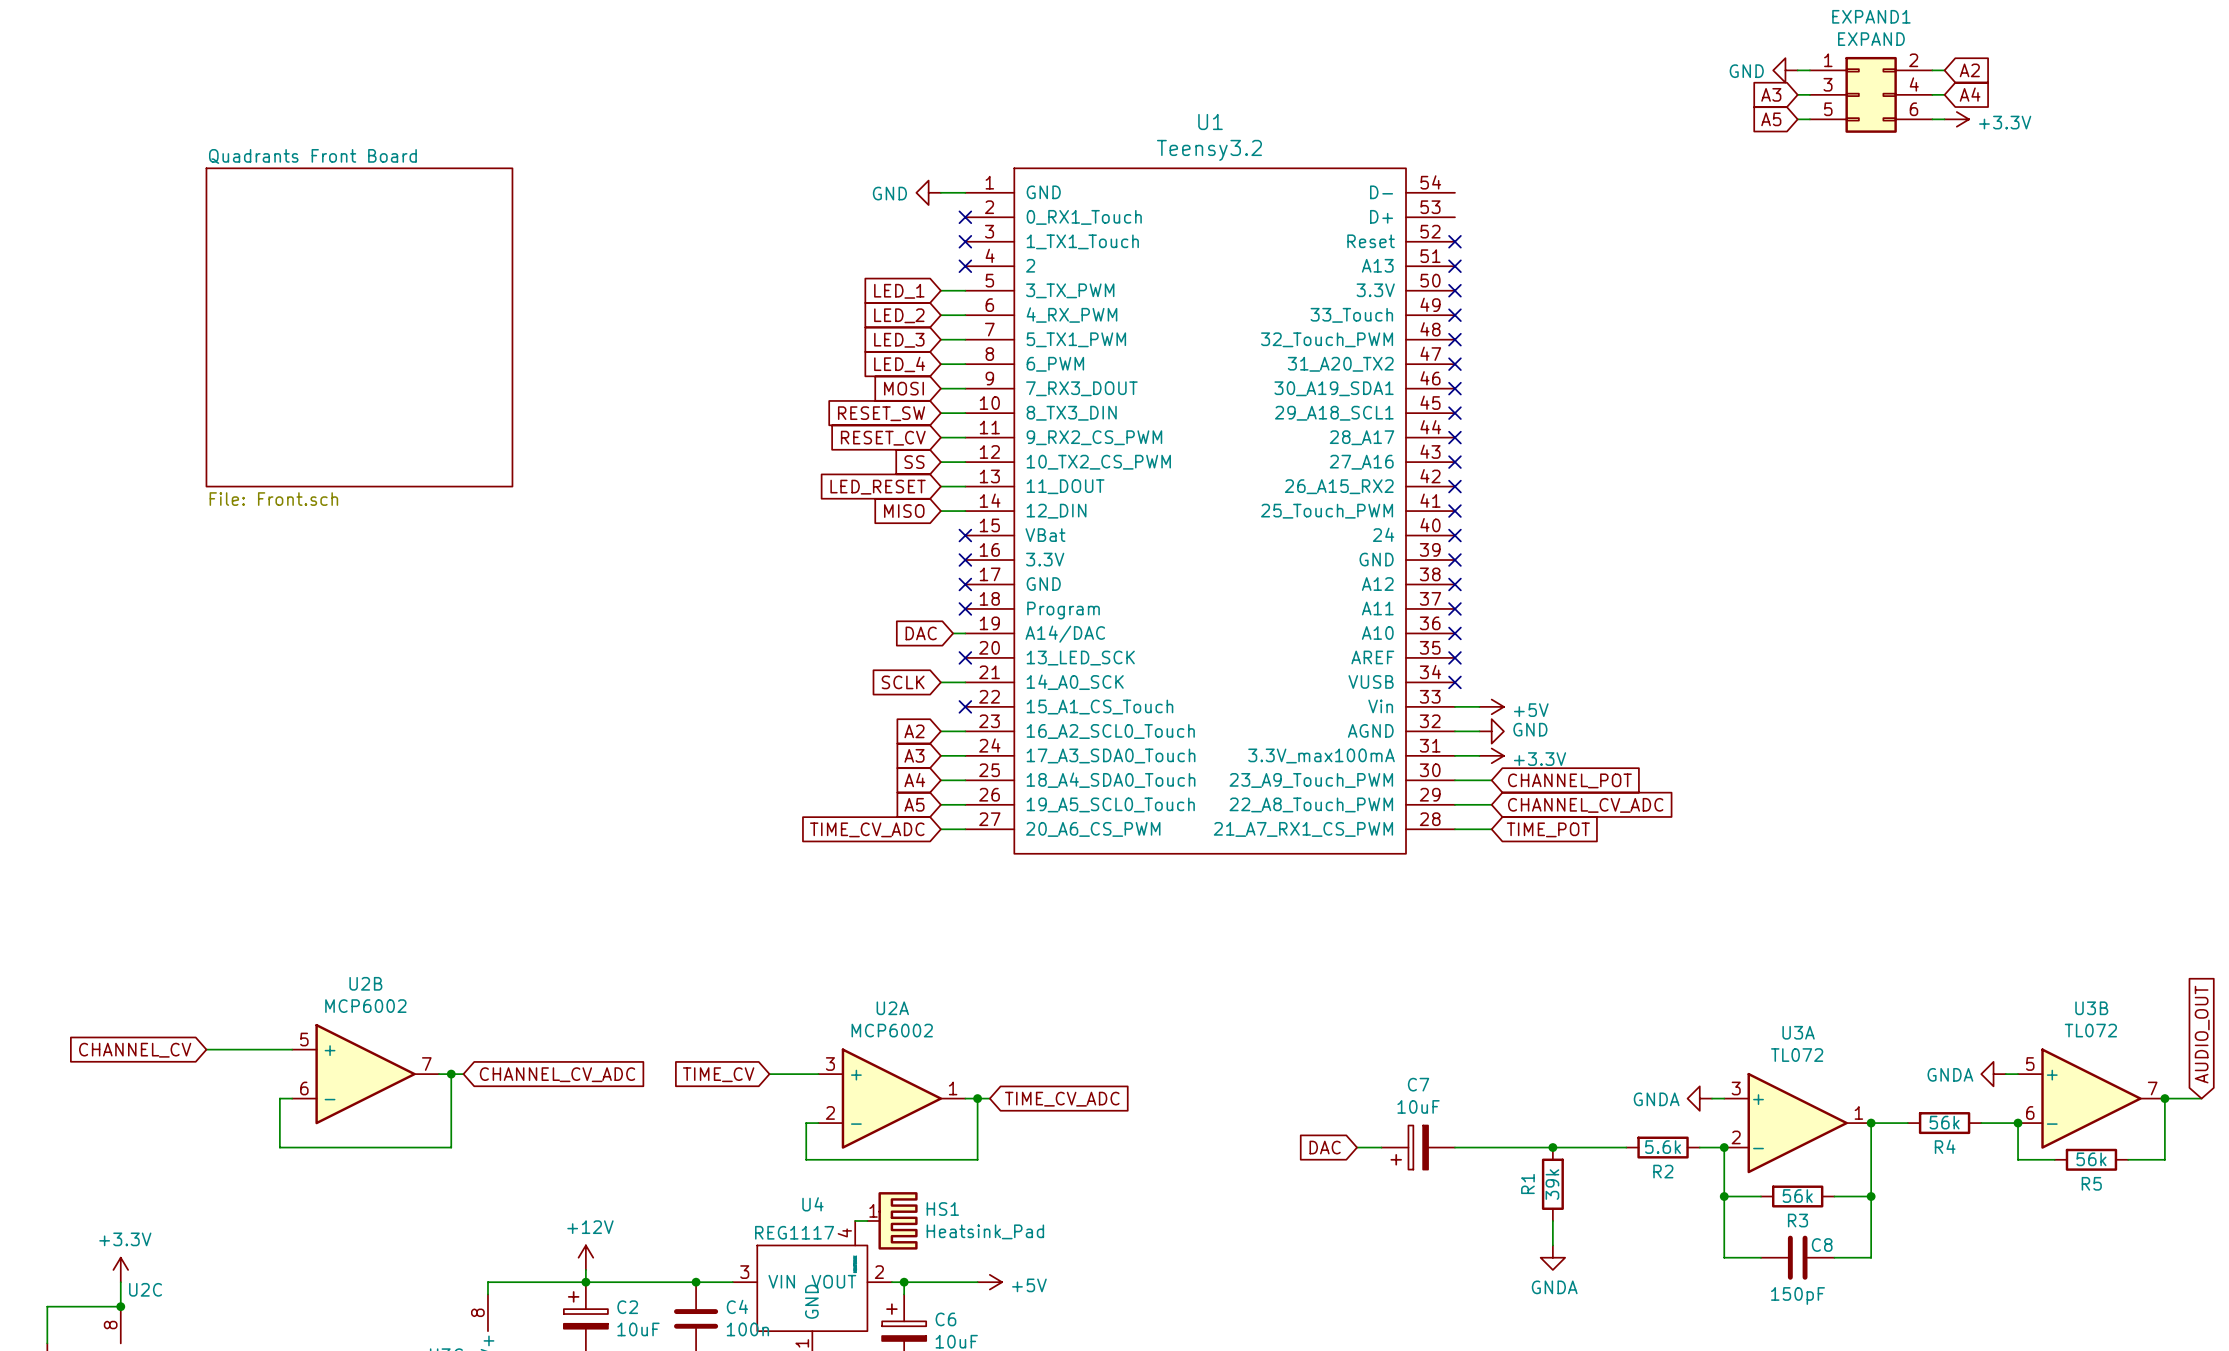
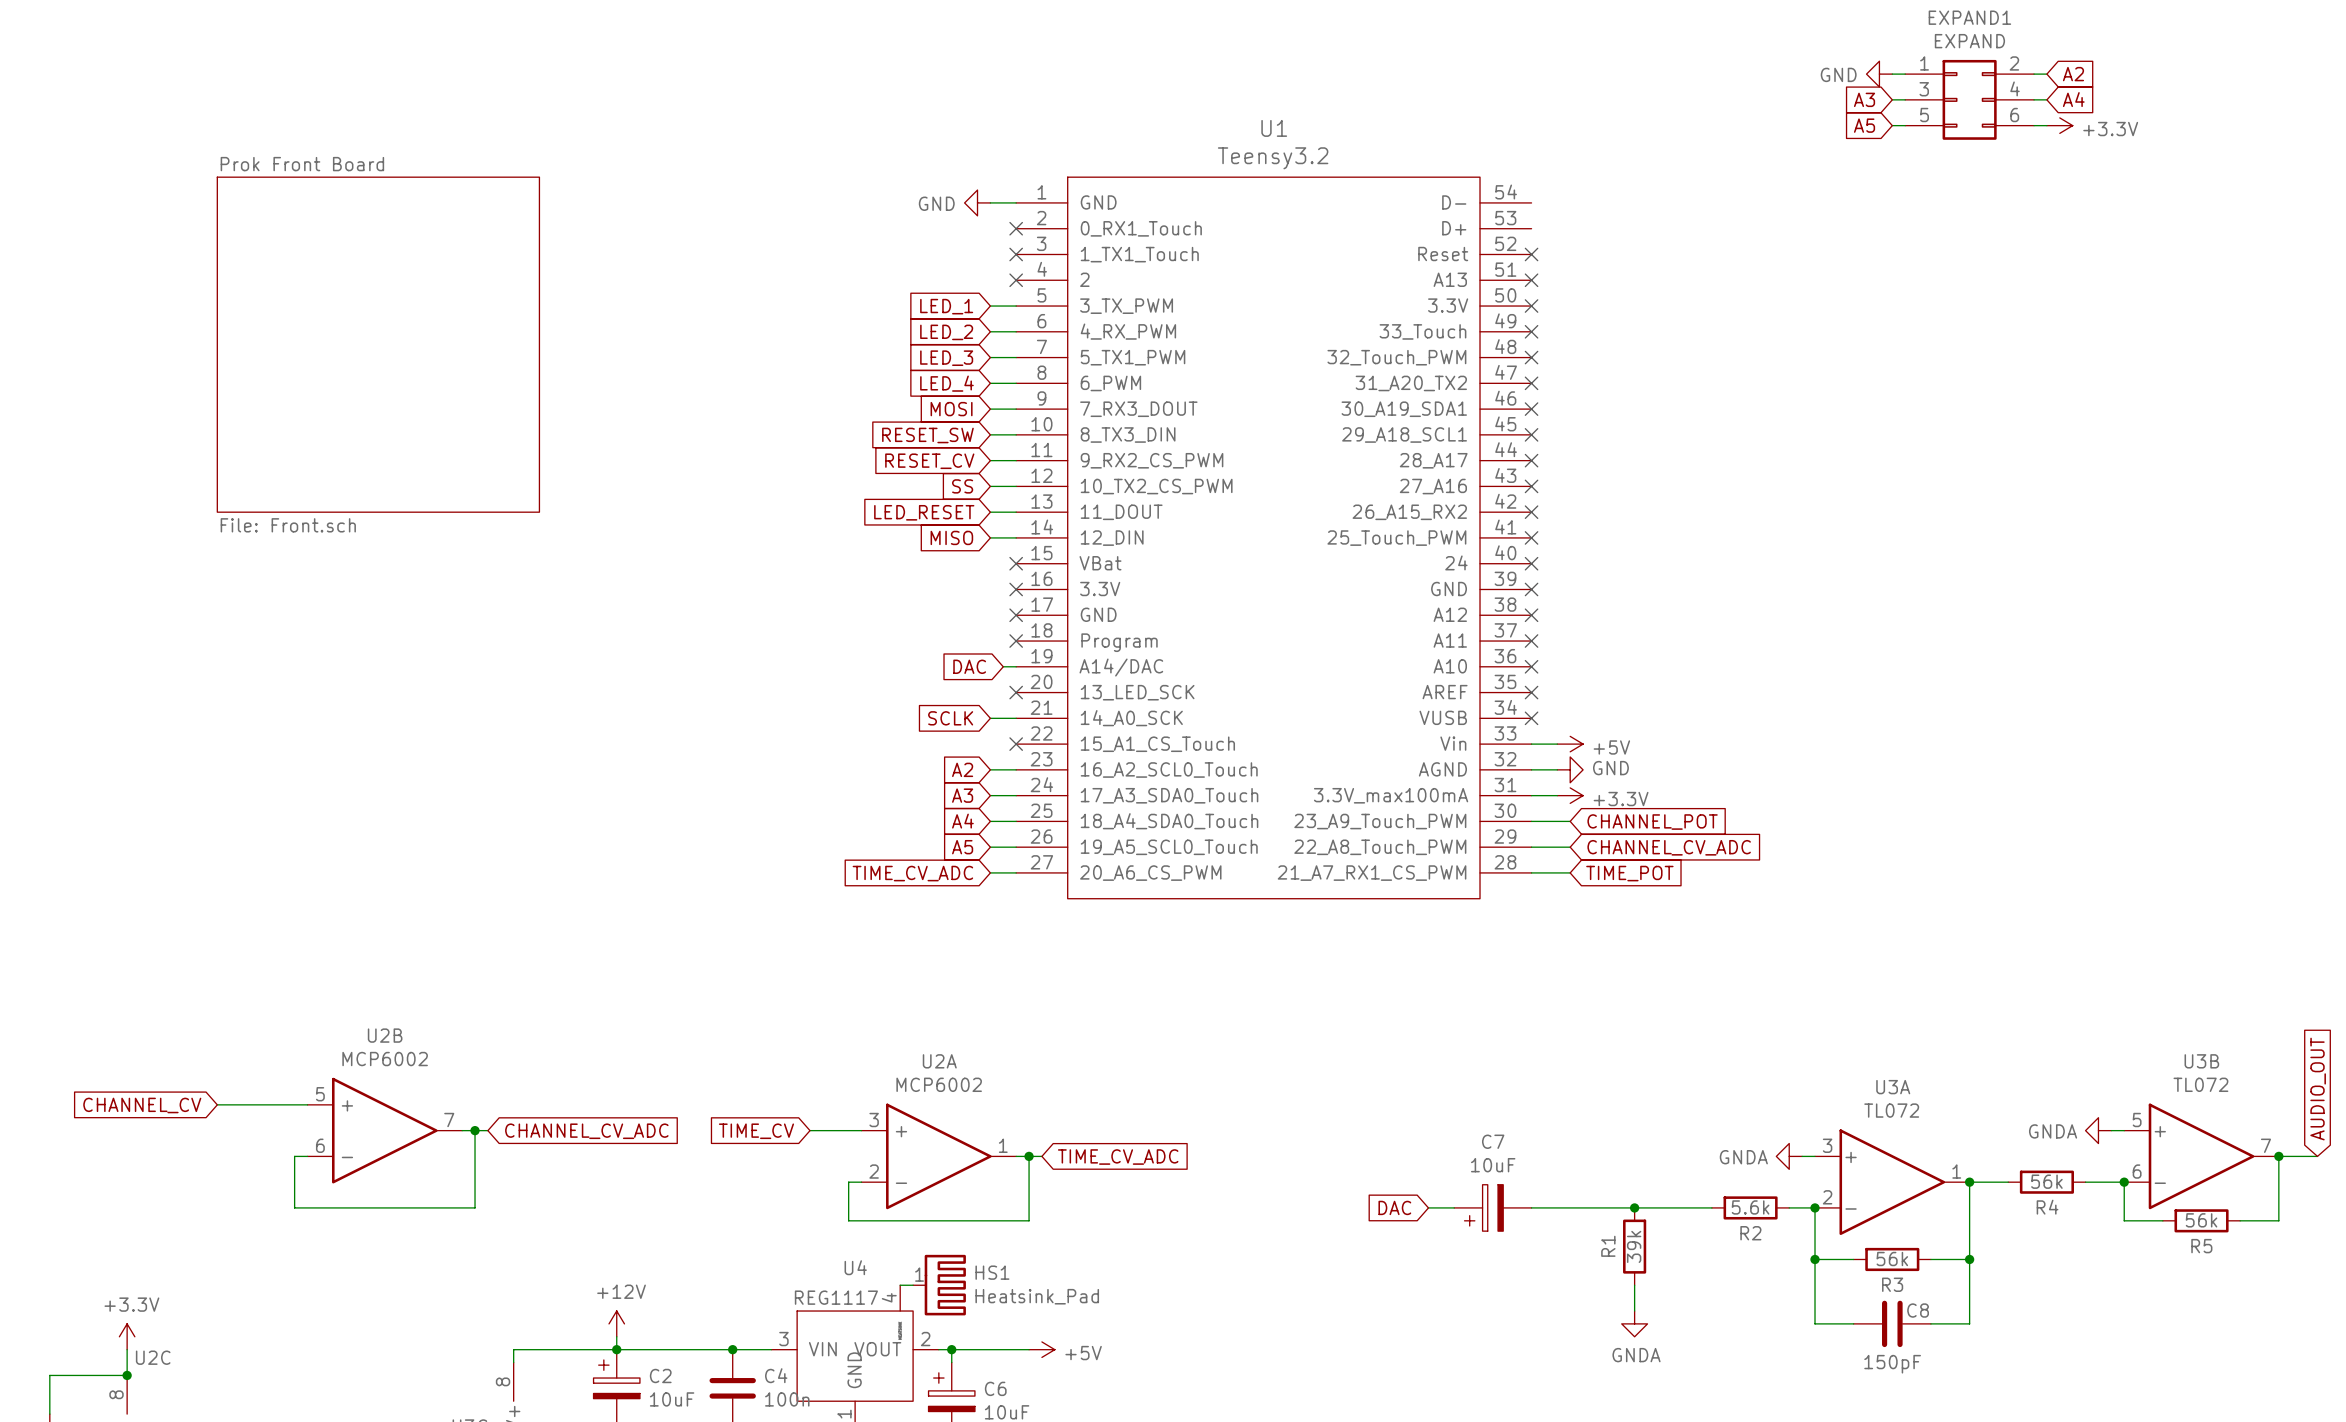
sheet Quadrants Front Board name: Quadrants Front Board (312, 156) -> Prok Front Board (302, 164)

